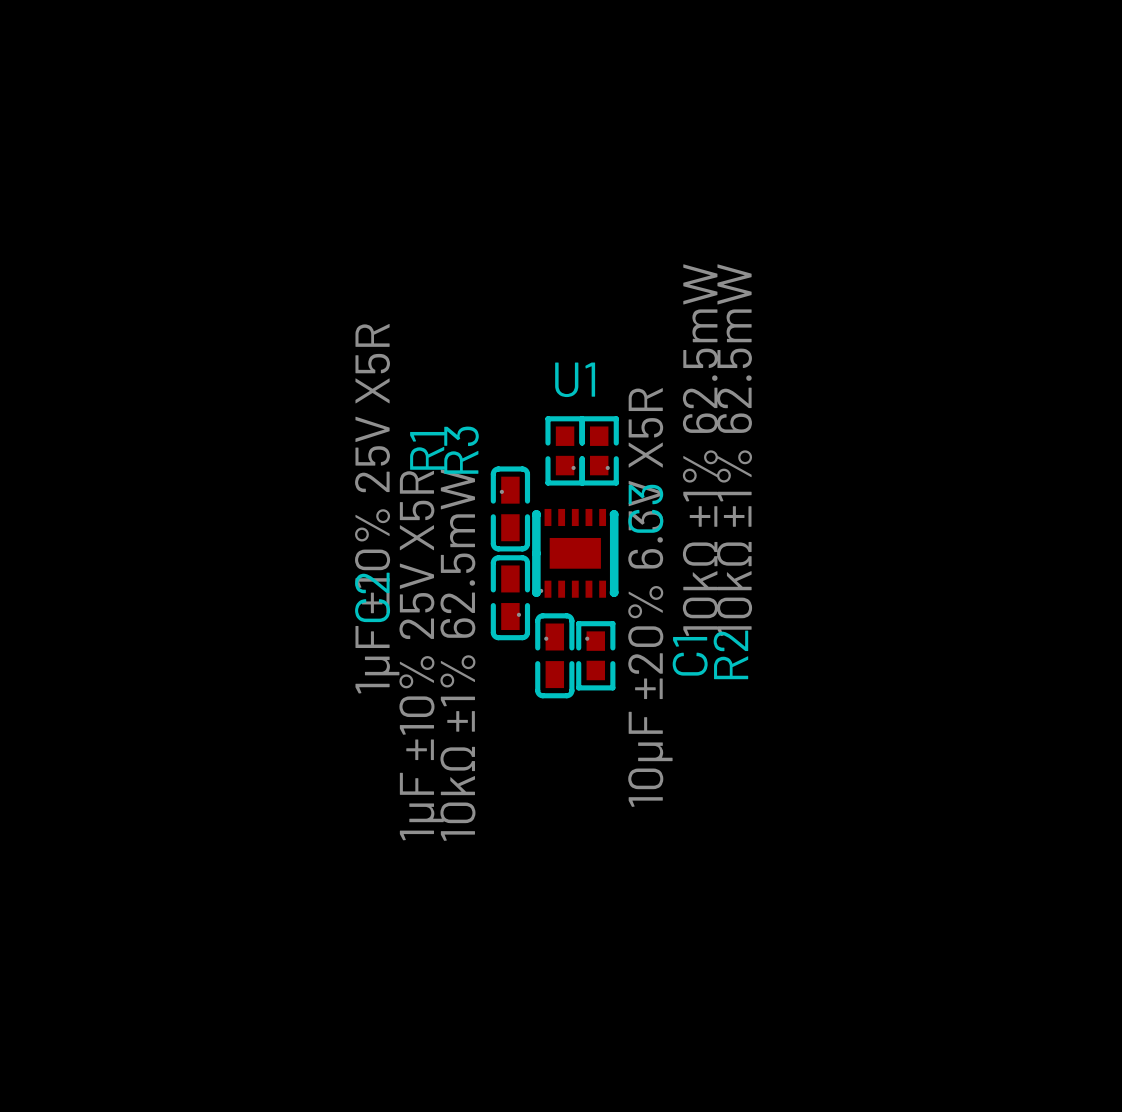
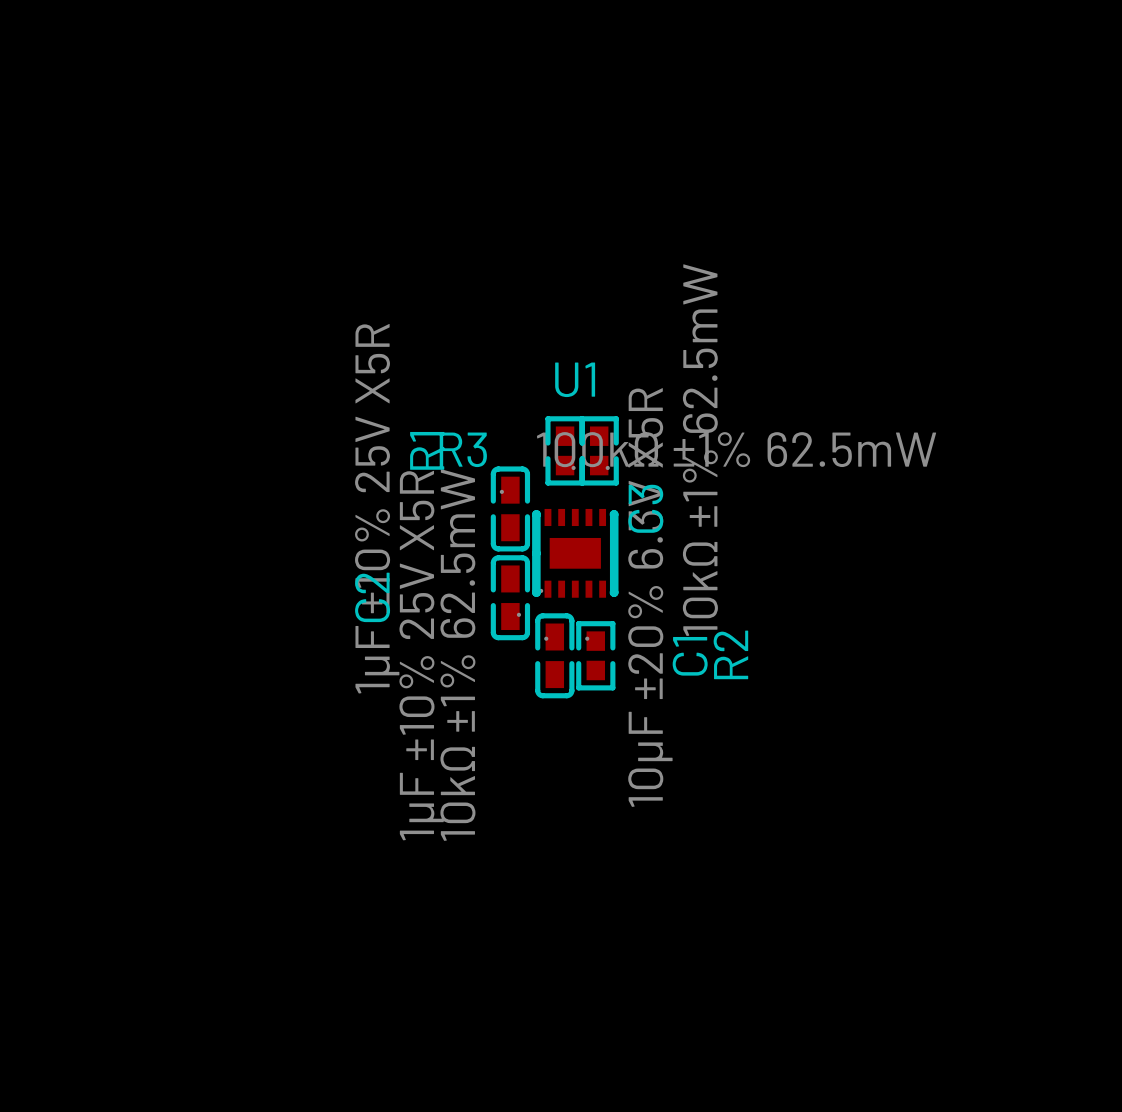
R3 name rotation: 0° (461, 450) -> 90° clockwise (463, 449)
R3 value: 10kΩ ±1% 62.5mW (734, 450) -> 100kΩ ±1% 62.5mW (736, 449)

